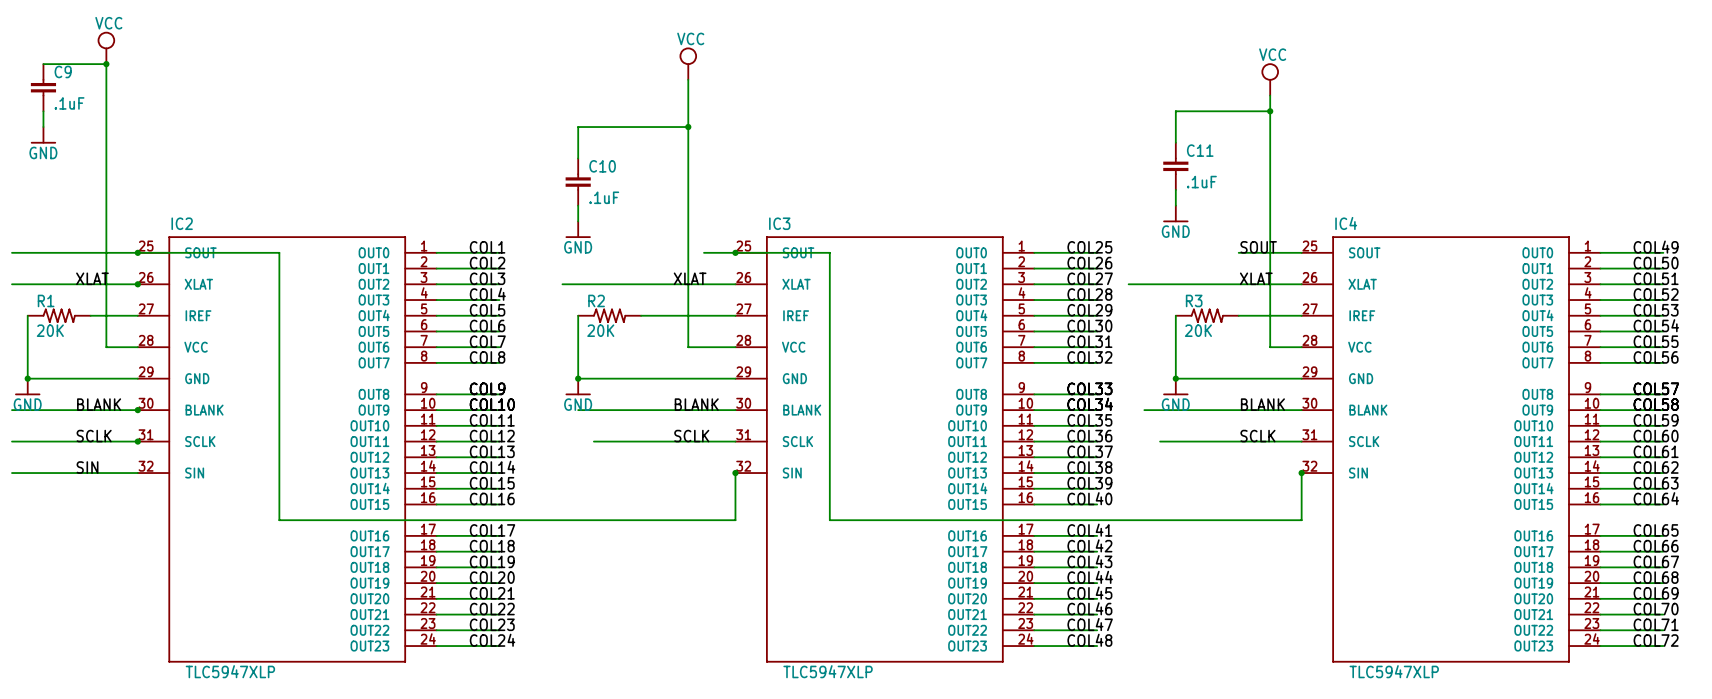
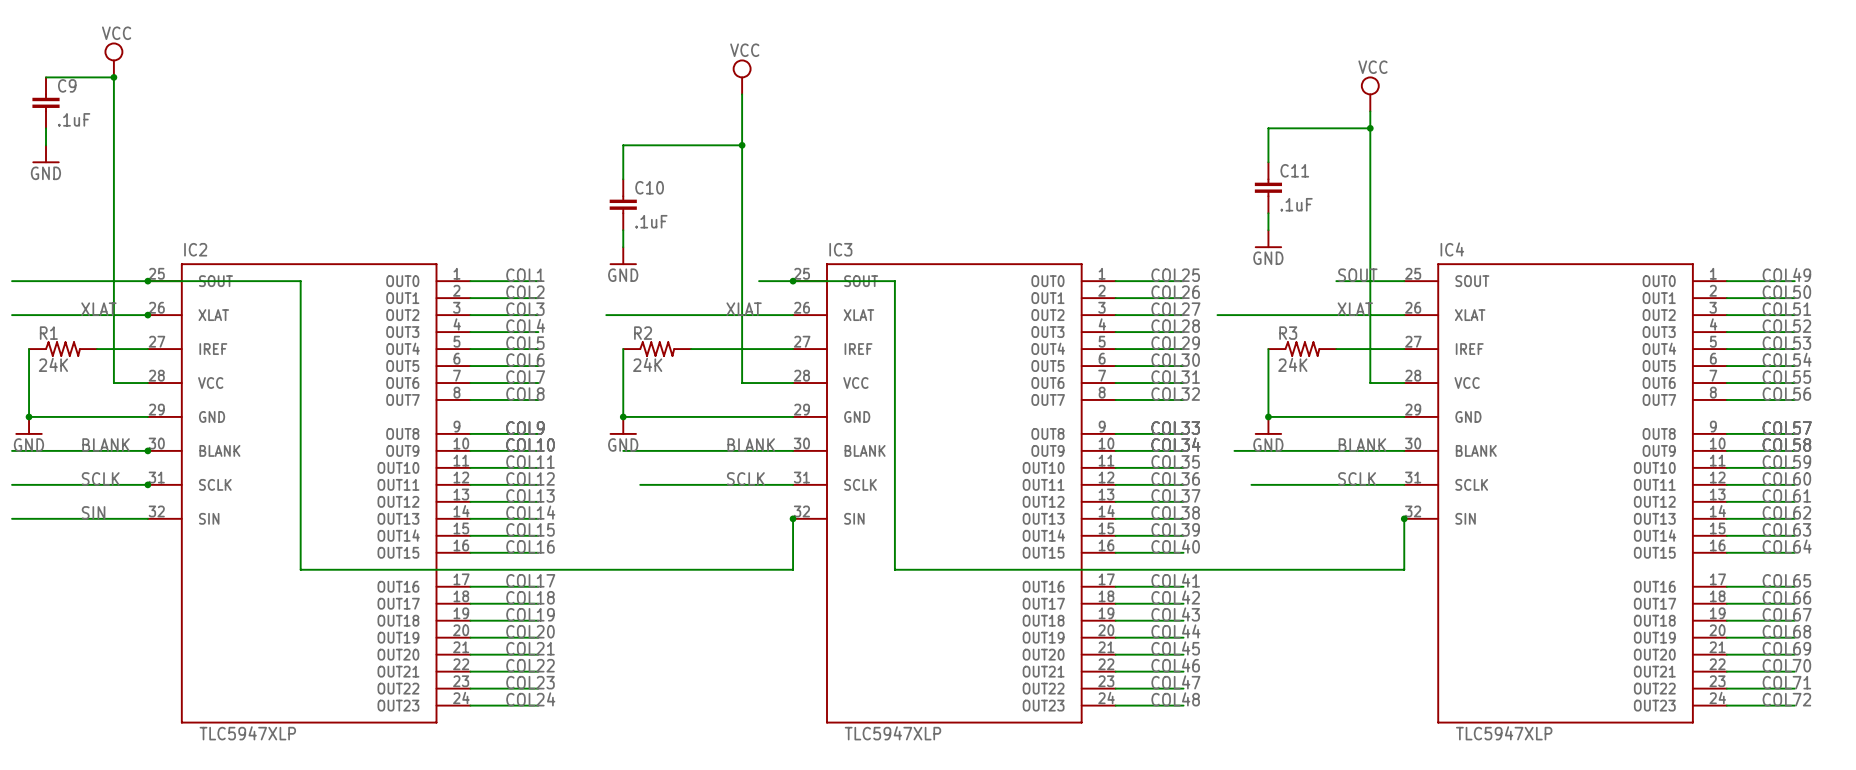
R1 value: 20K (50, 330) -> 24K (53, 364)
R2 value: 20K (600, 330) -> 24K (647, 364)
R3 value: 20K (1198, 330) -> 24K (1292, 364)

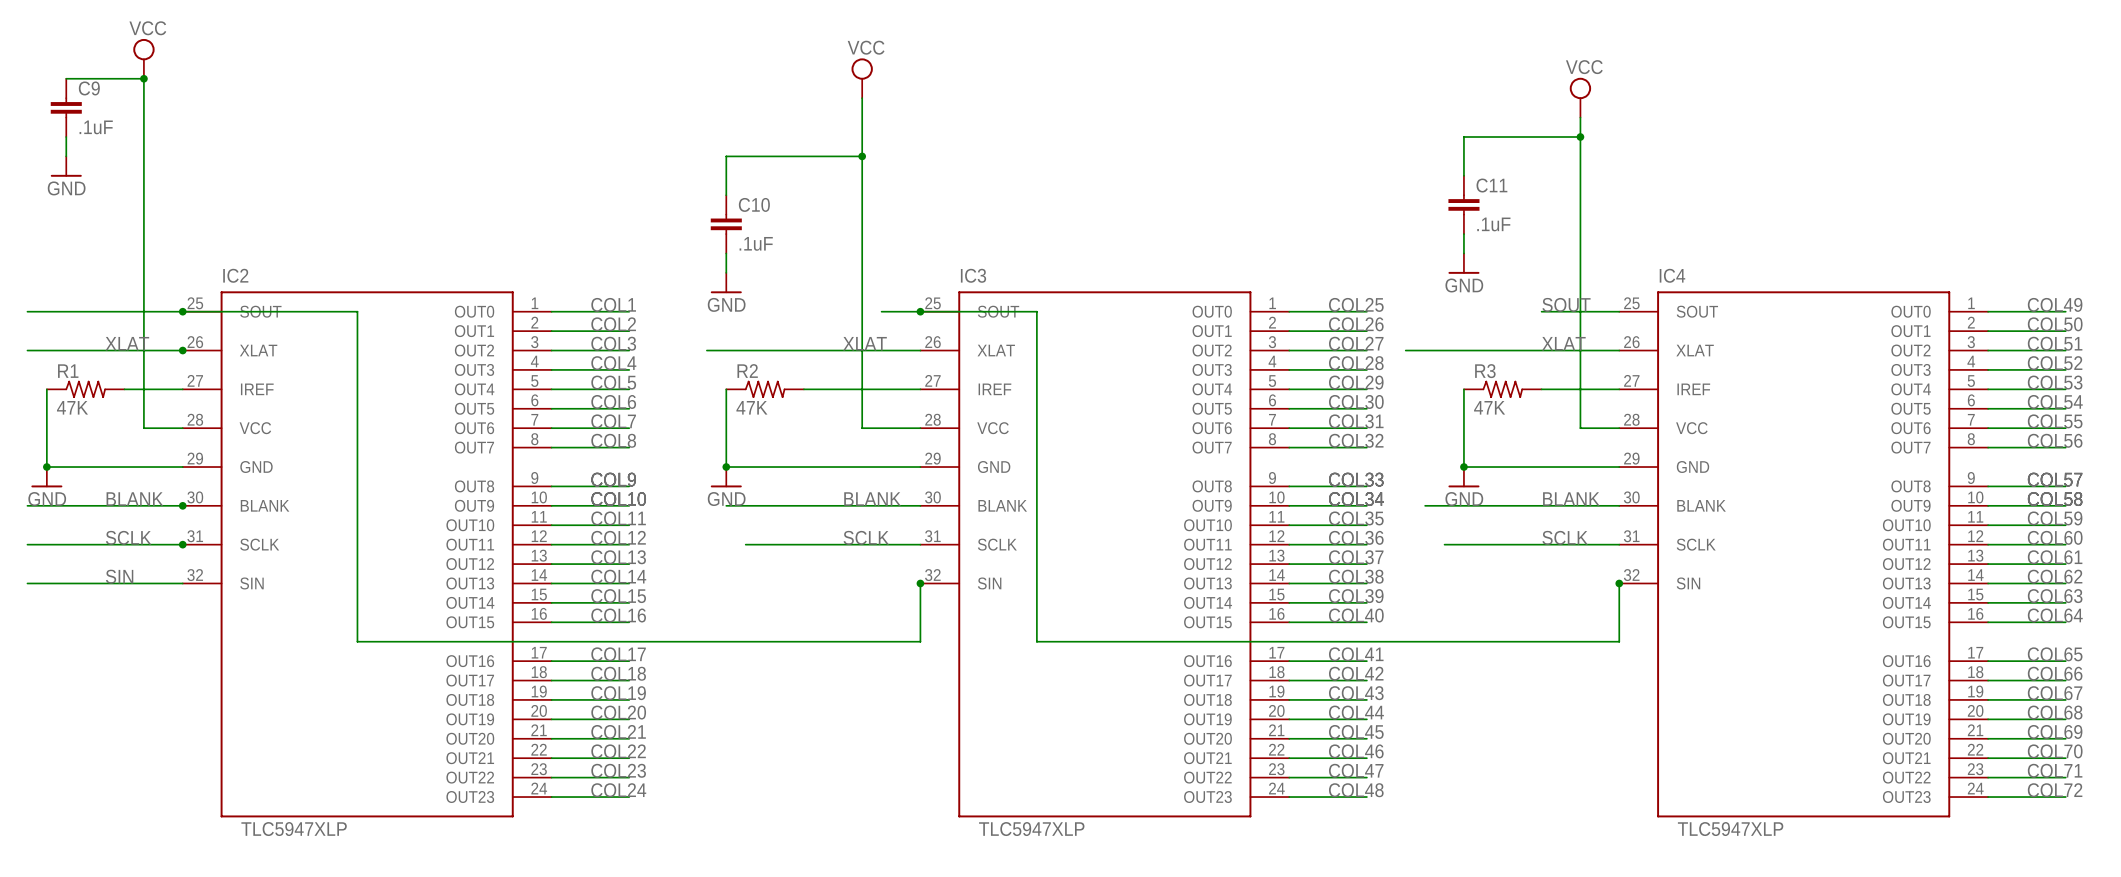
R1 value: 24K (53, 364) -> 47K (72, 407)
R2 value: 24K (647, 364) -> 47K (751, 407)
R3 value: 24K (1292, 364) -> 47K (1489, 407)

